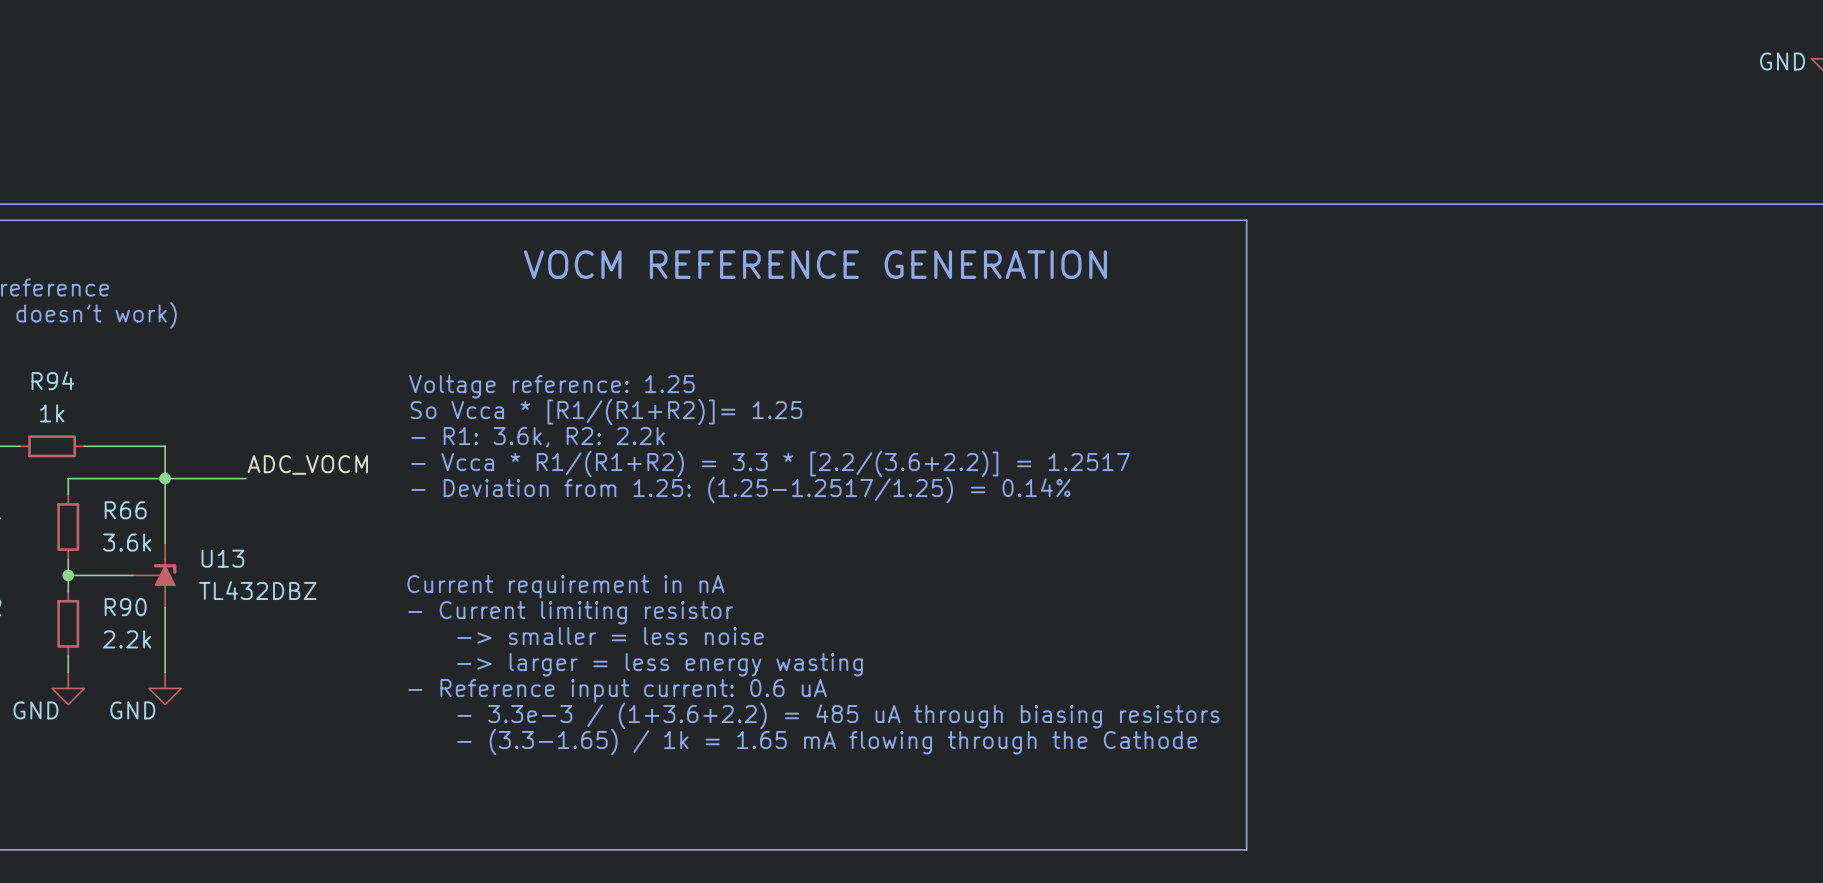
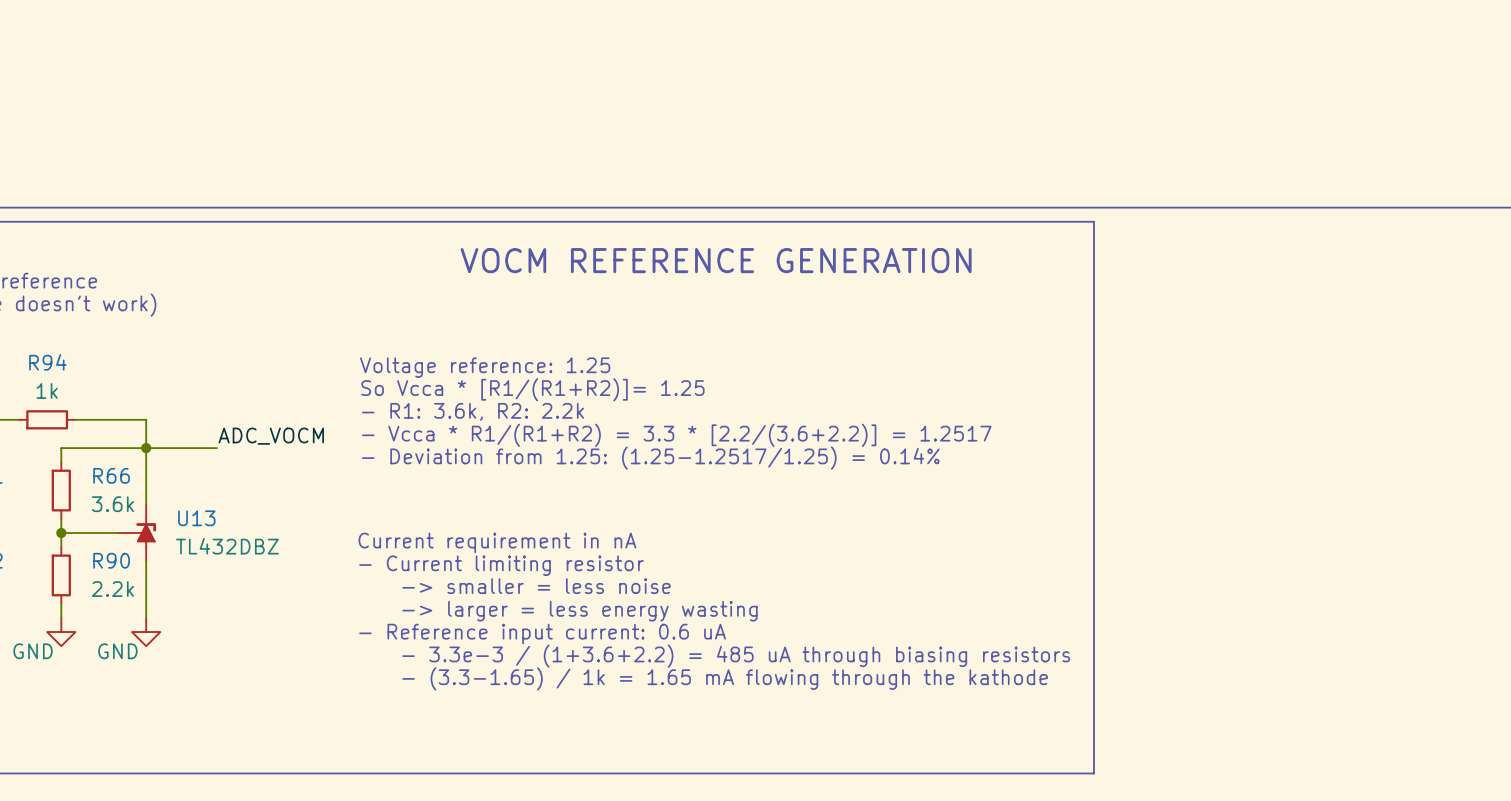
text: - (3.3-1.65) / 1k = 1.65 mA flowing through the Cathode (827, 741) -> - (3.3-1.65) / 1k = 1.65 mA flowing through the kathode (725, 678)

